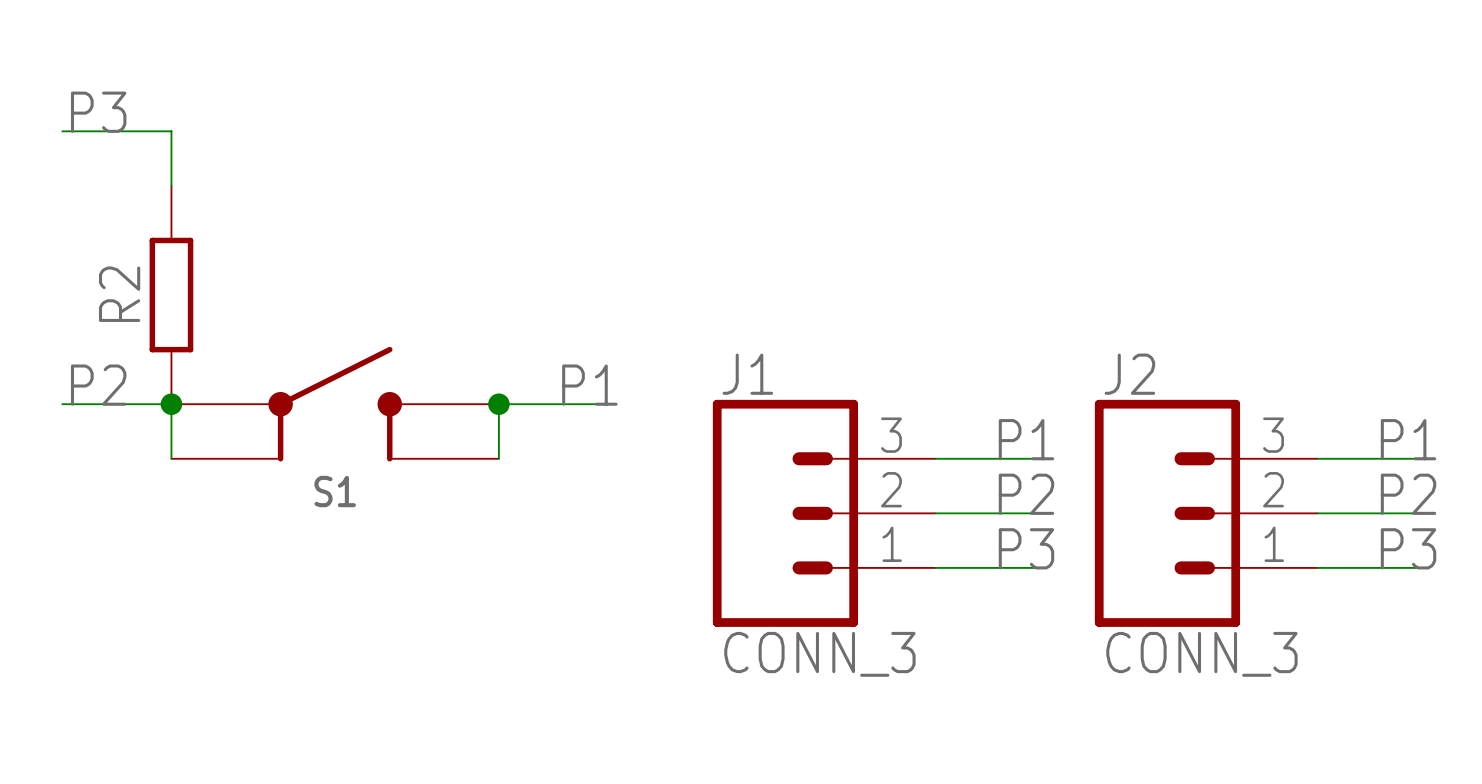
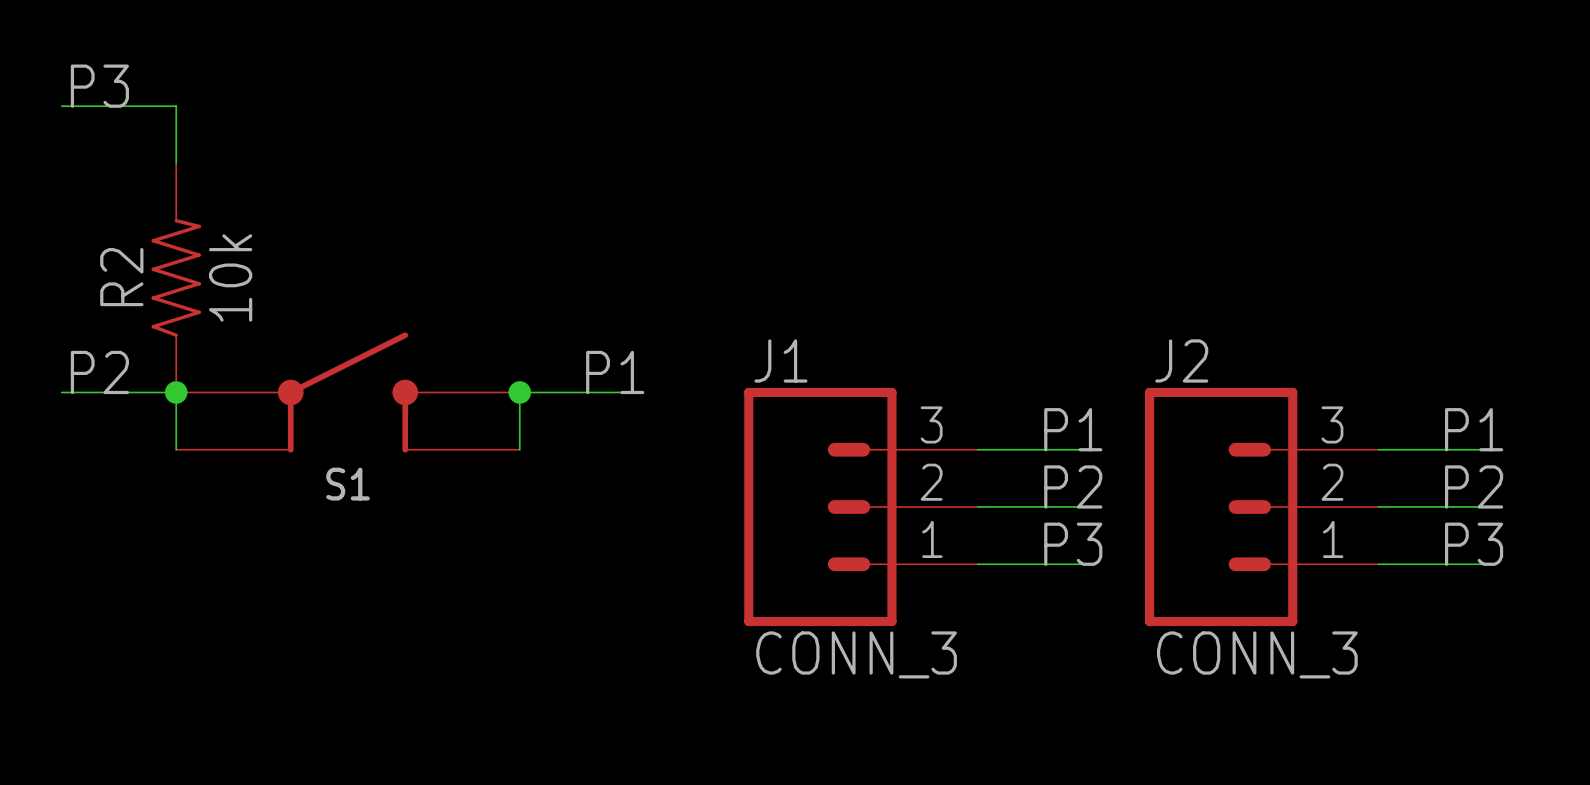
R2 symbol: [149, 185, 194, 405] -> [151, 163, 201, 393]
R2 value: none -> 10k (230, 277)

